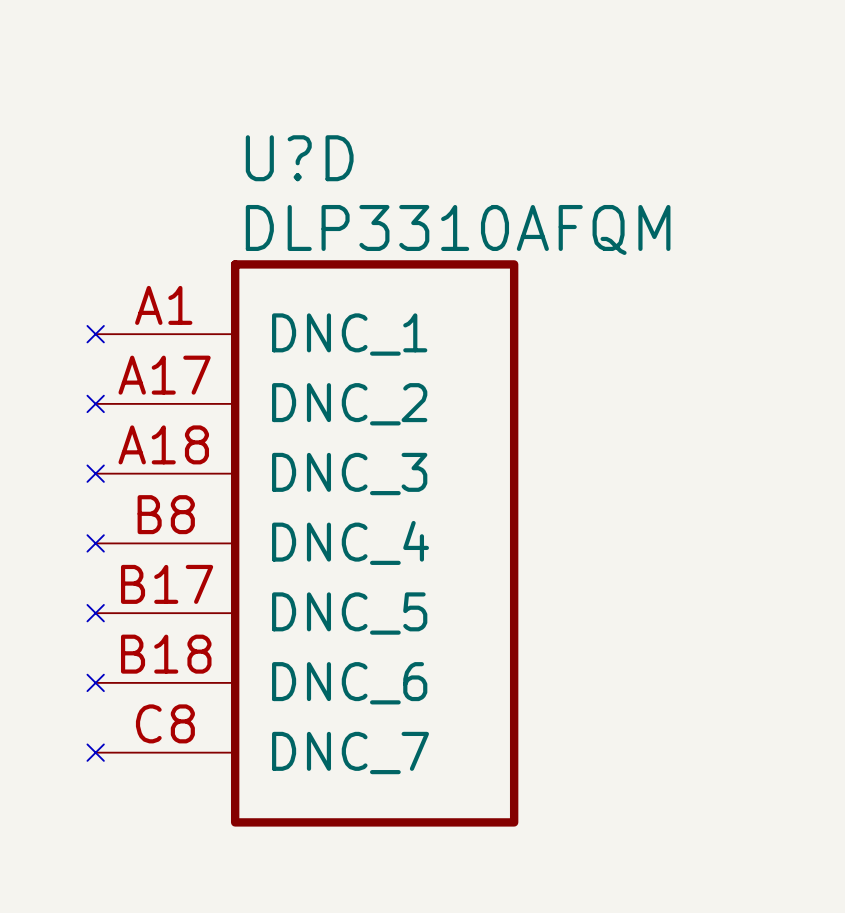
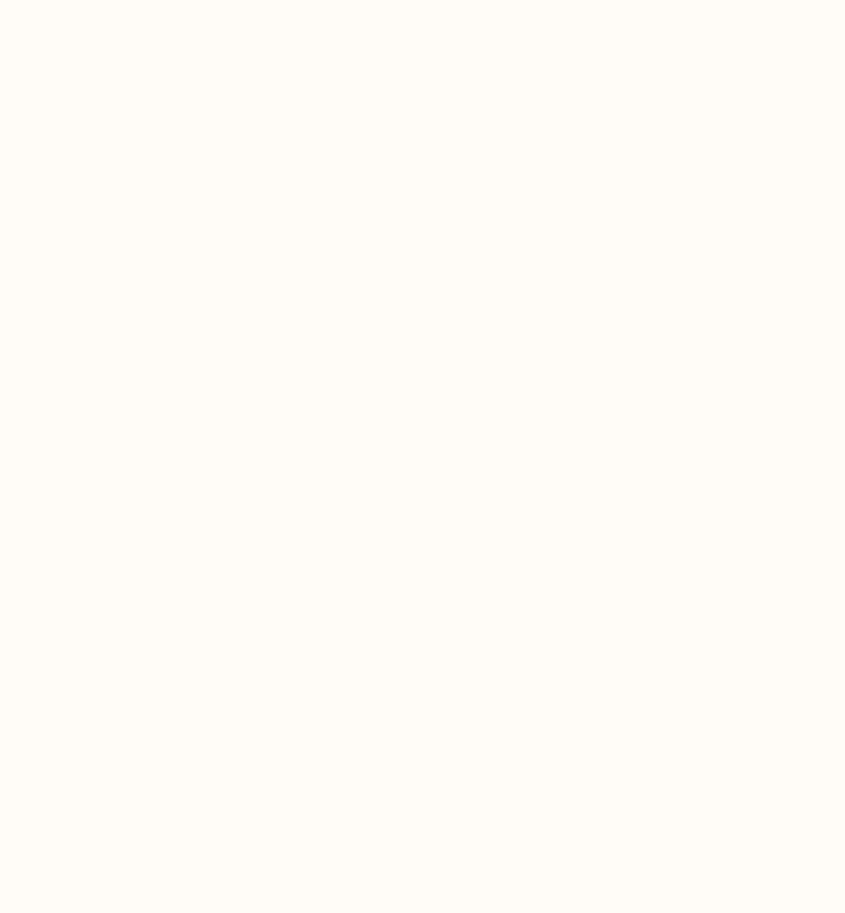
U?D: DLP3310AFQM (302, 543) -> none

